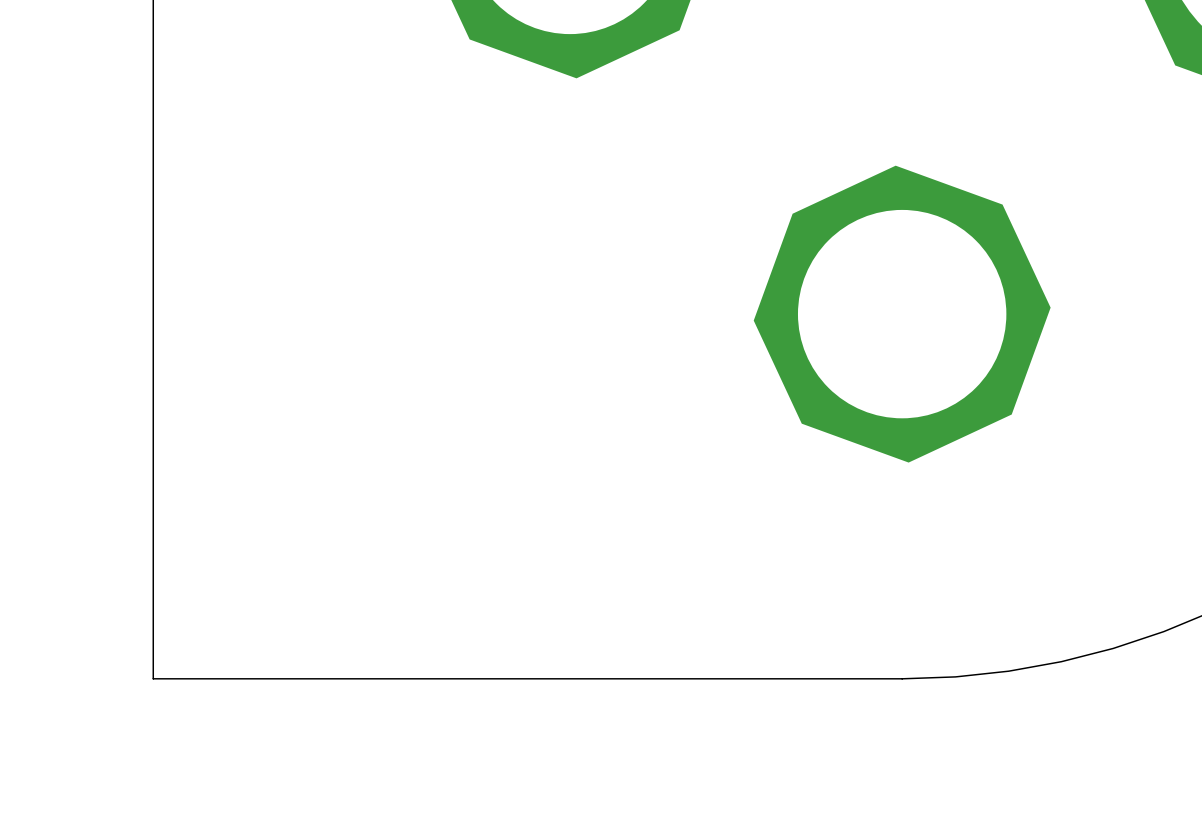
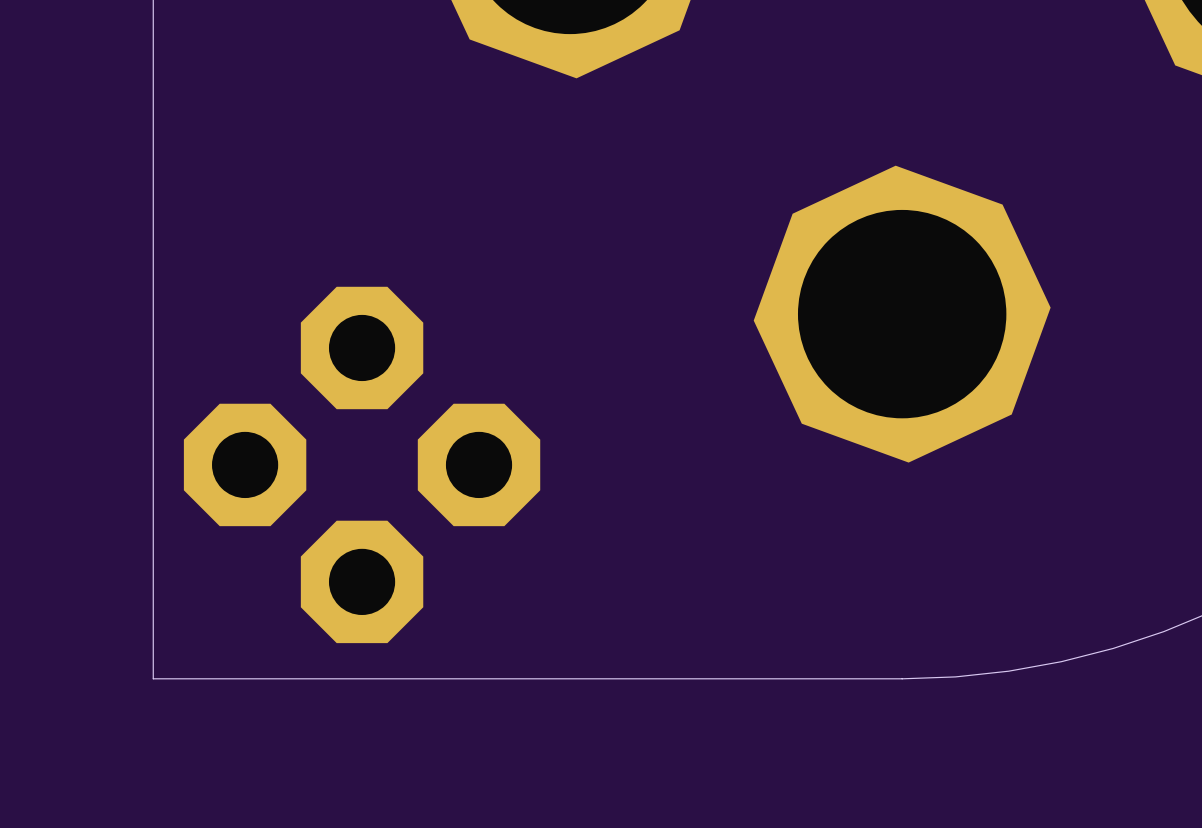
part: none -> (362, 464)

